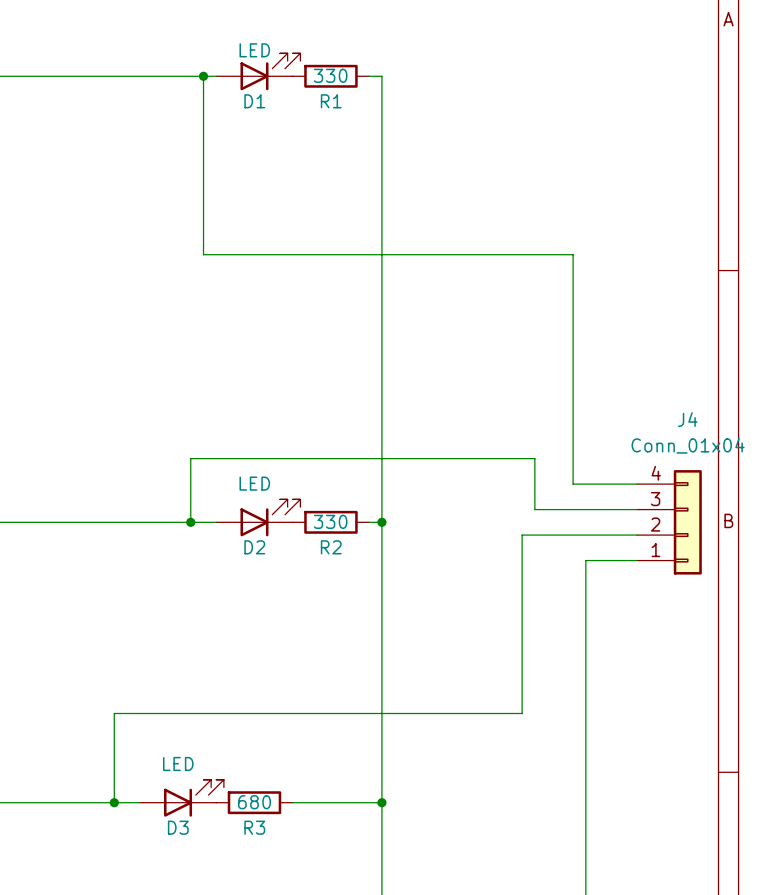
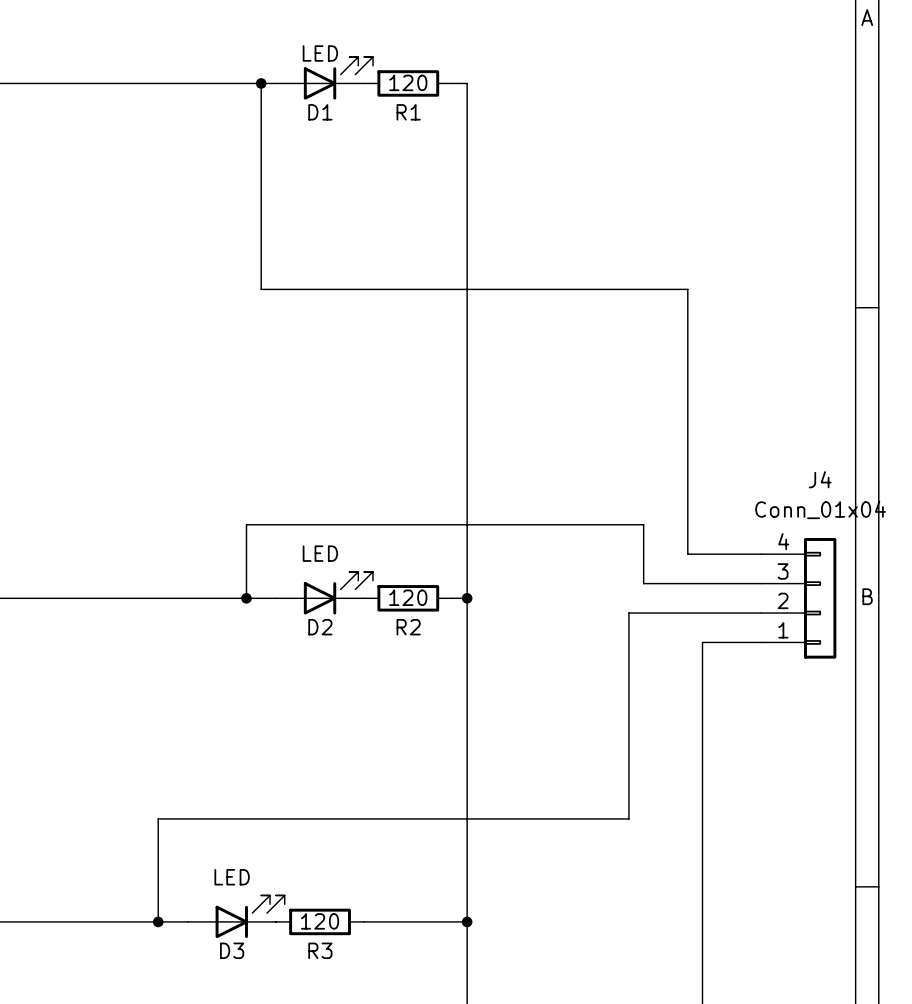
R1 value: 330 (330, 75) -> 120 (408, 82)
R2 value: 330 (330, 521) -> 120 (408, 597)
R3 value: 680 (254, 802) -> 120 (320, 921)

